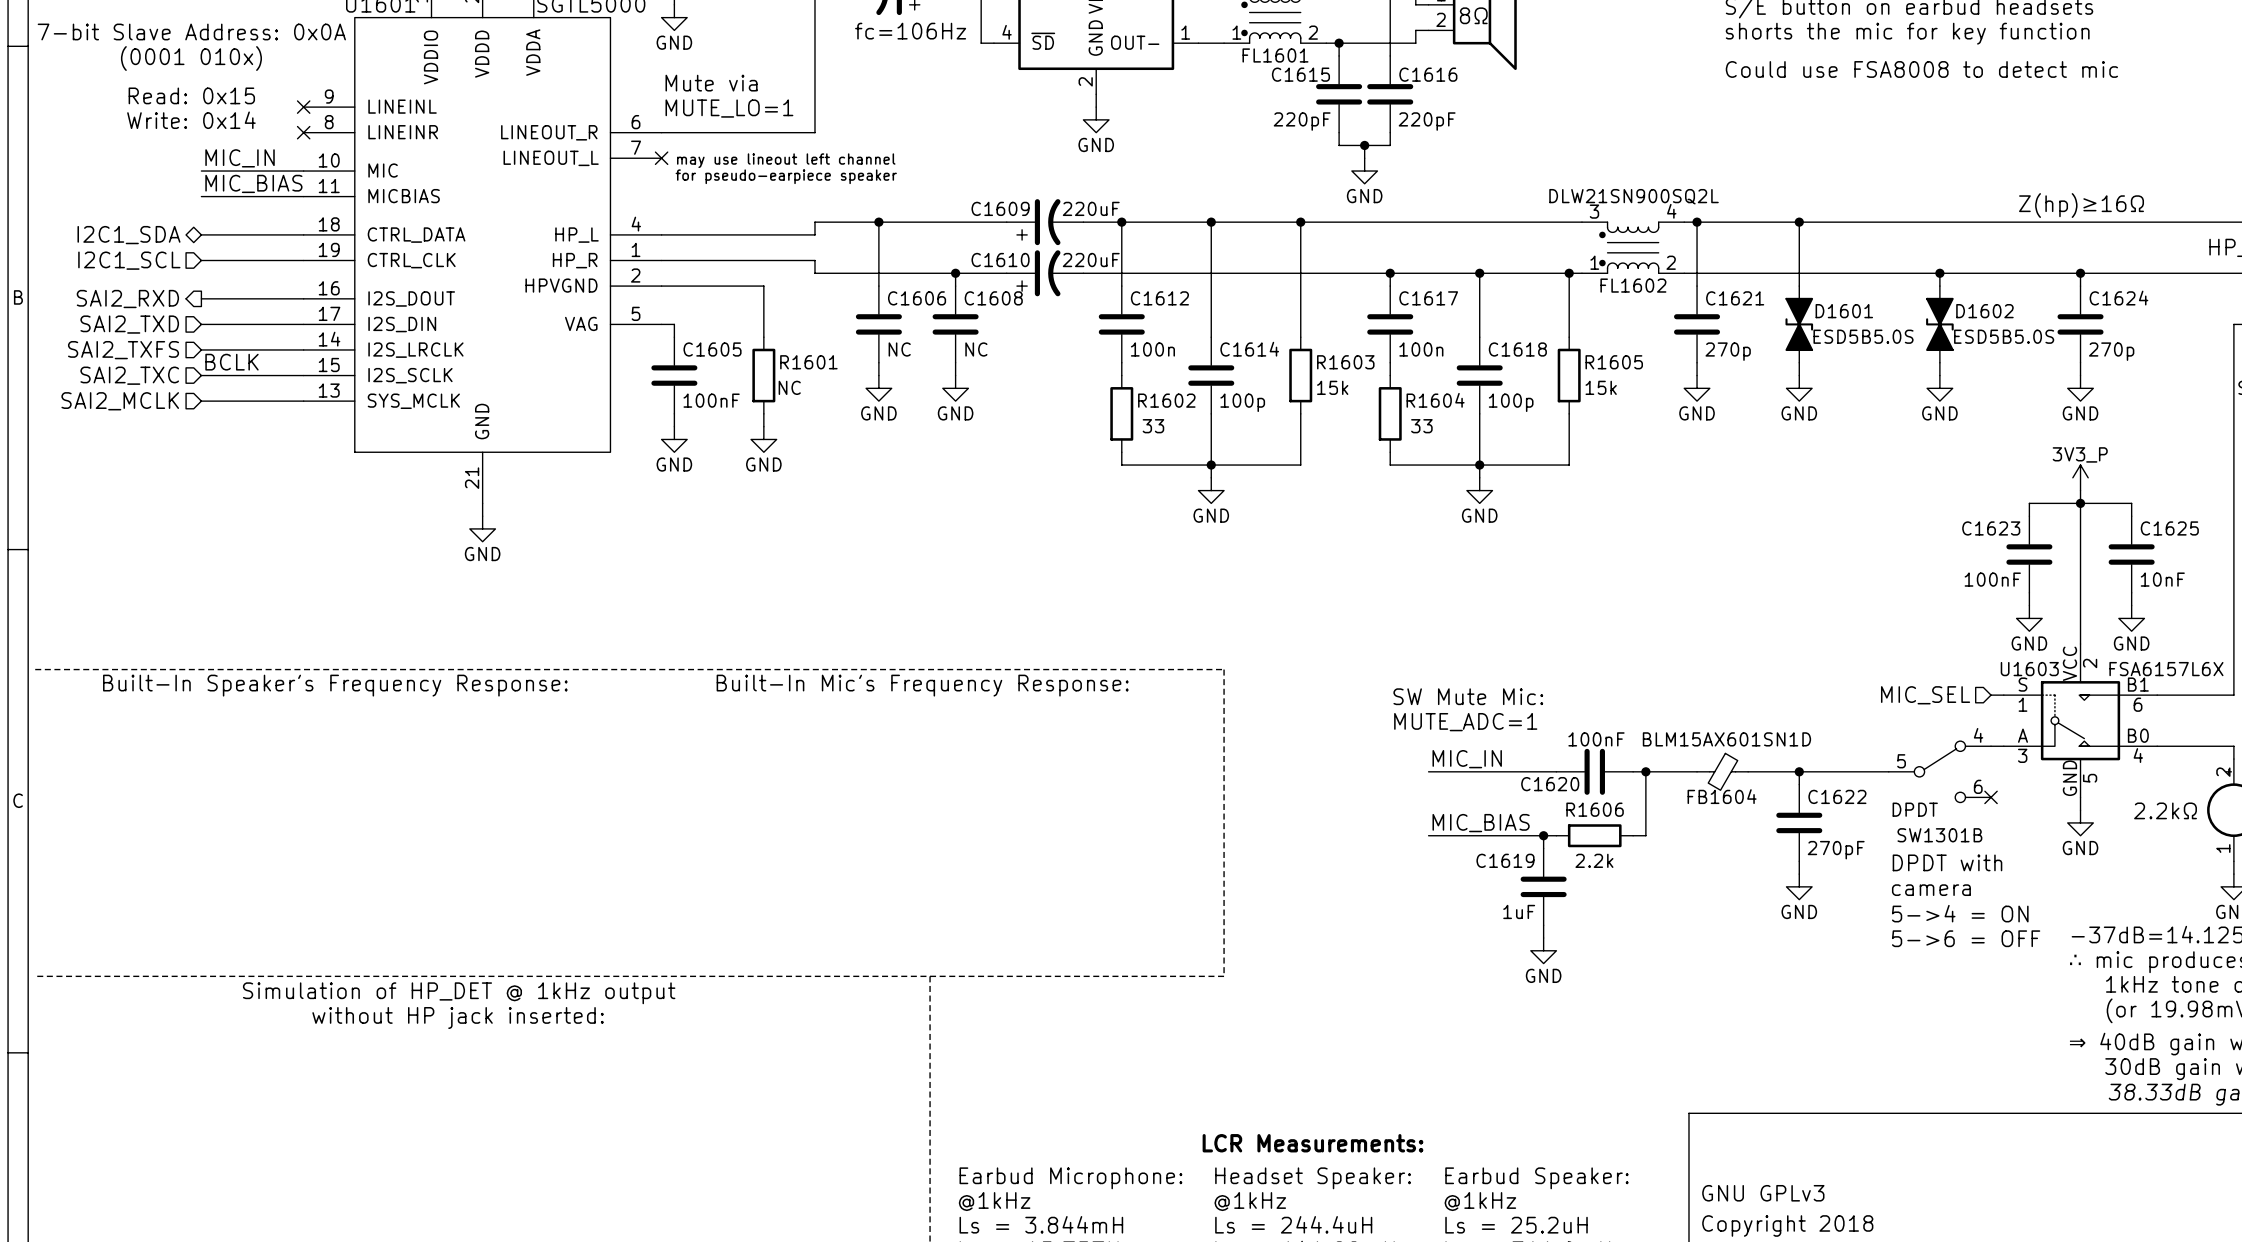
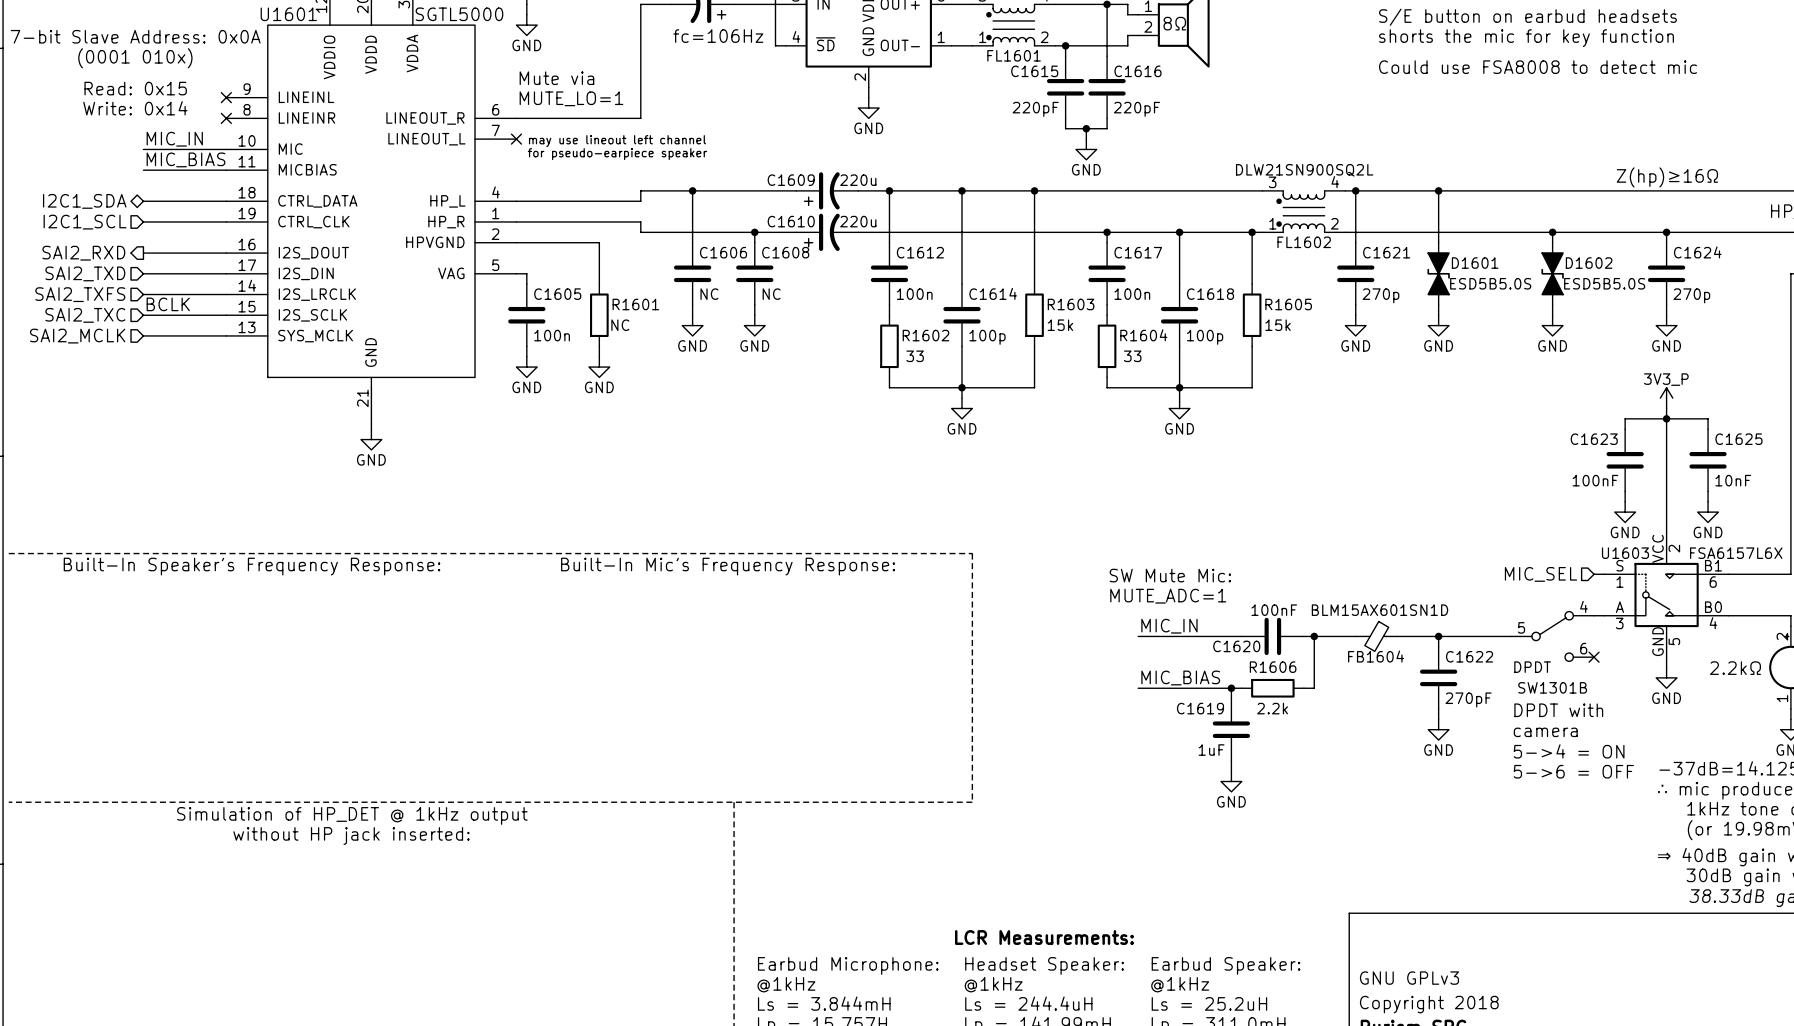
C1609 value: 220uF (1091, 208) -> 220u (858, 180)
C1610 value: 220uF (1091, 260) -> 220u (858, 221)
C1605 value: 100nF (711, 400) -> 100n (552, 335)

